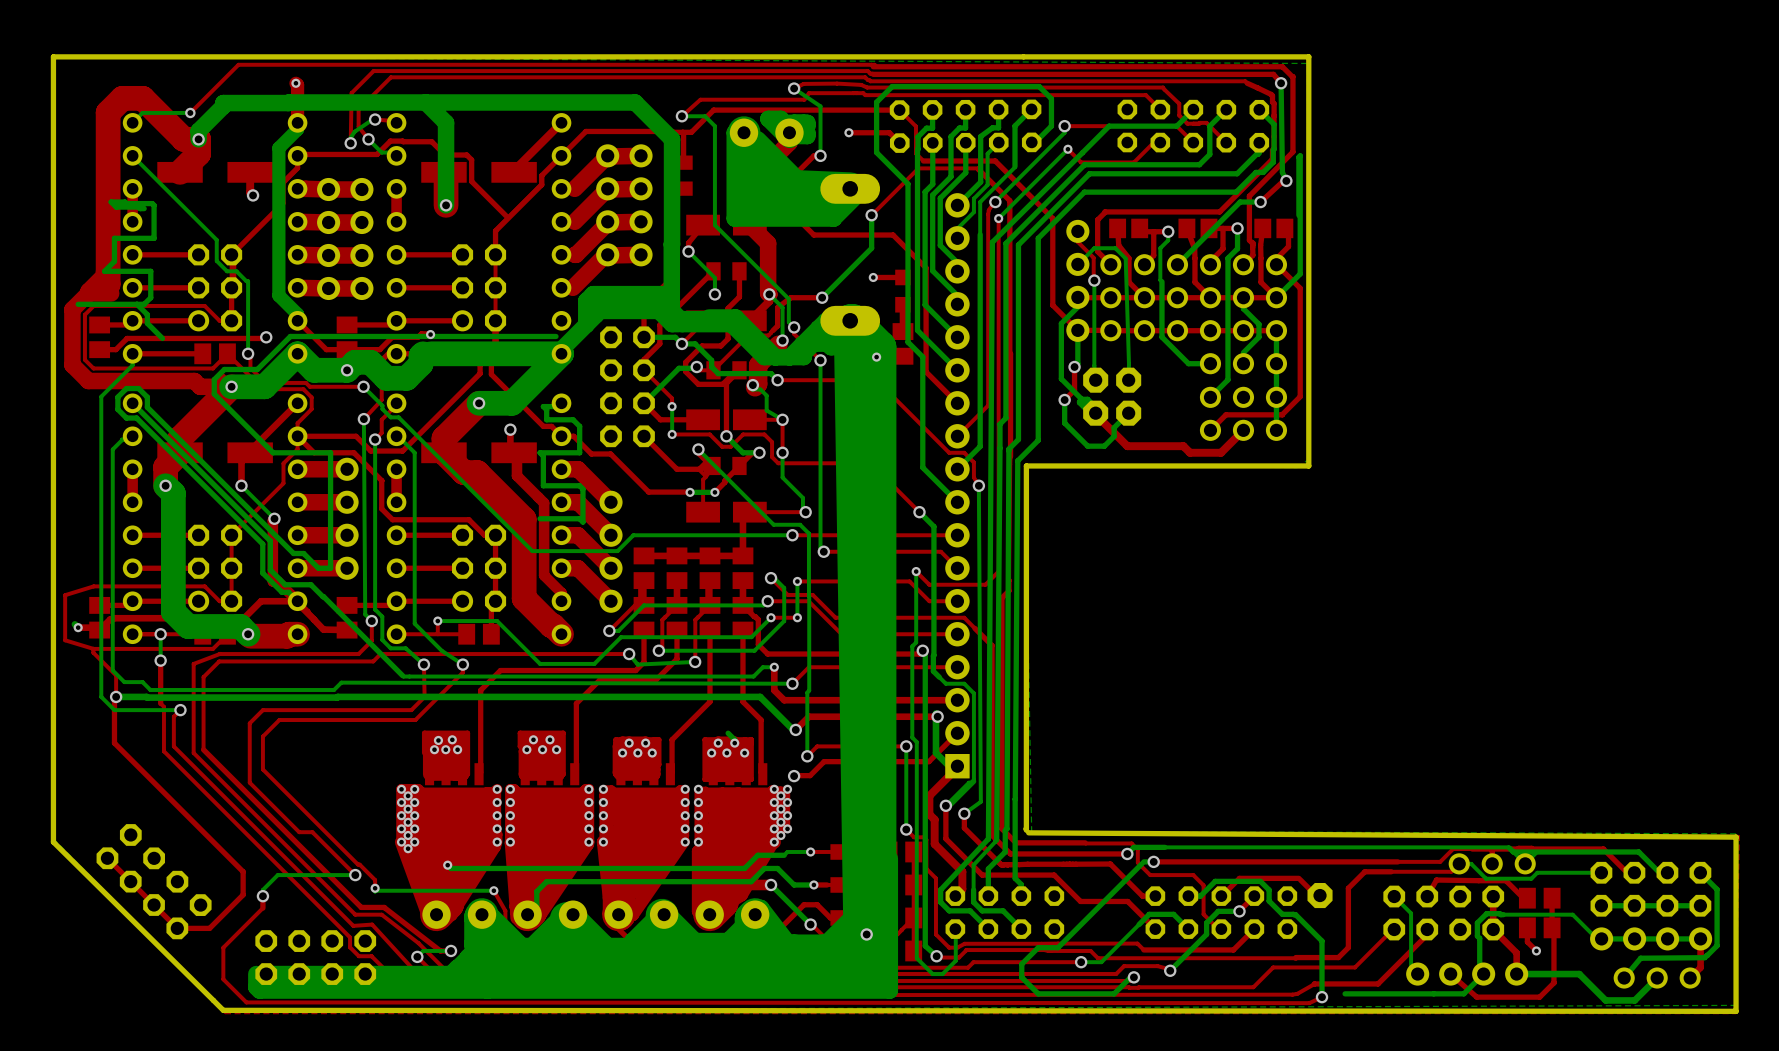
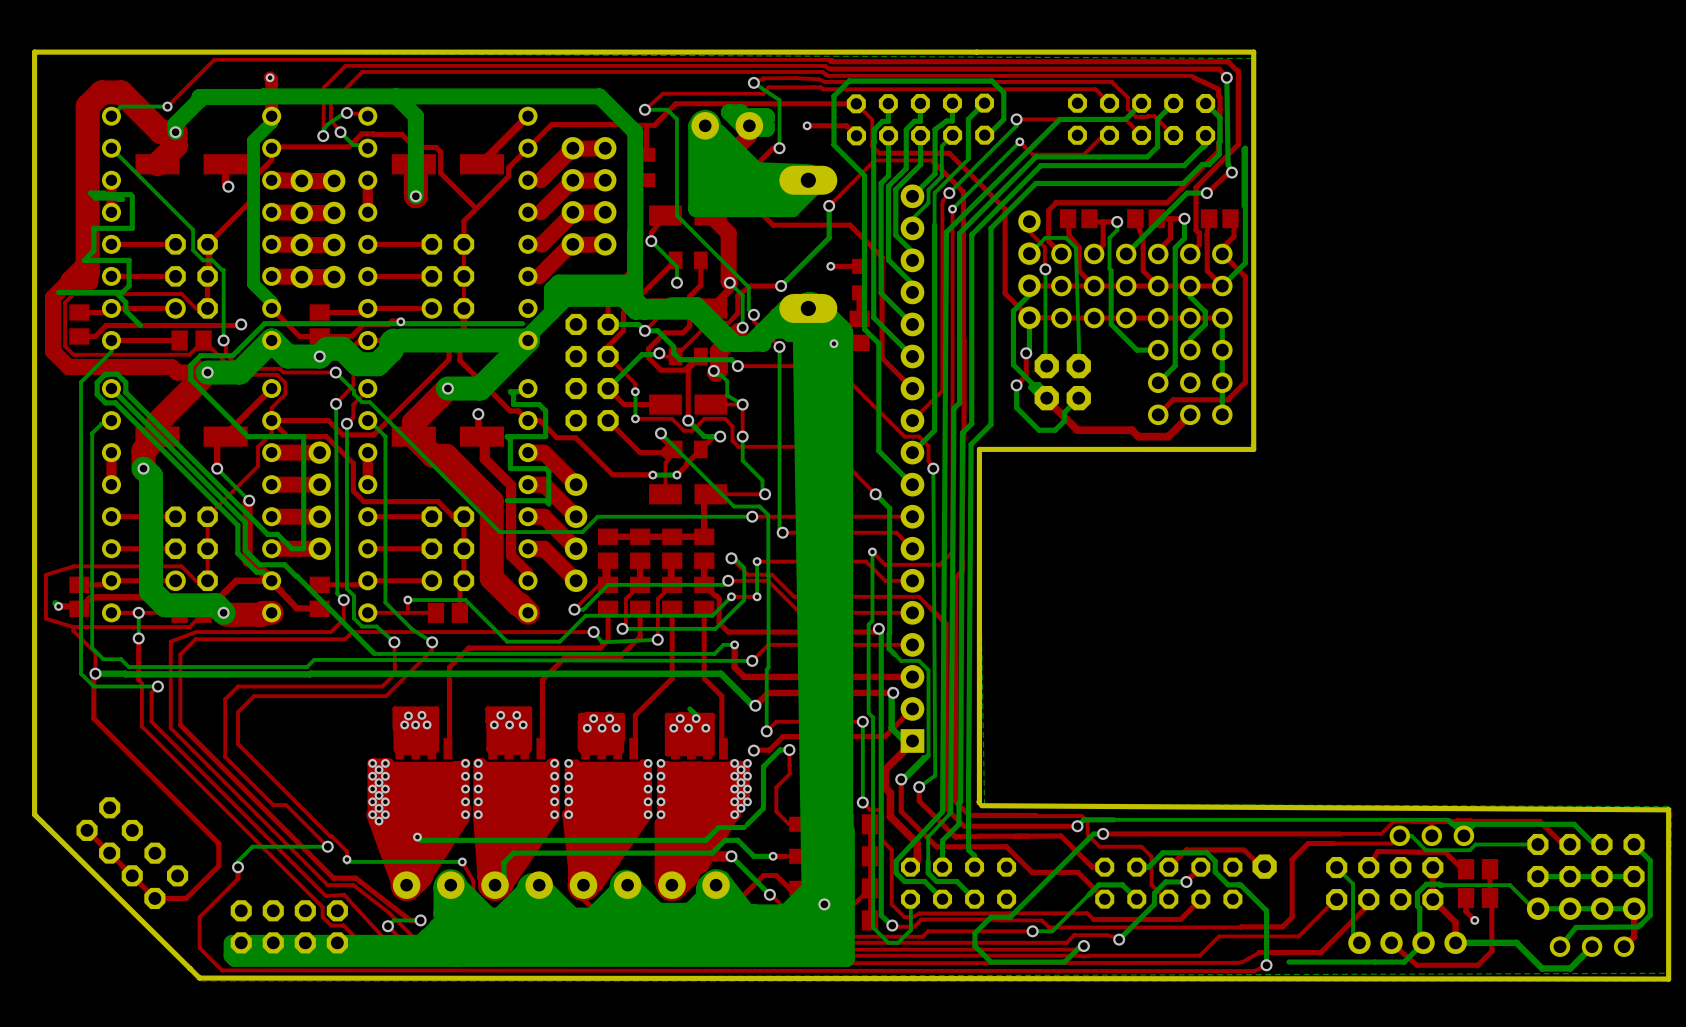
via: none -> (789, 749)
bottom track: (810, 851) (787, 851) -> (789, 749) (780, 749) (763, 766) (763, 808) (747, 824)
via: (810, 851) -> none
top track: (830, 851) (810, 851) -> (789, 824) (776, 811) (776, 787) (789, 774) (789, 749)

